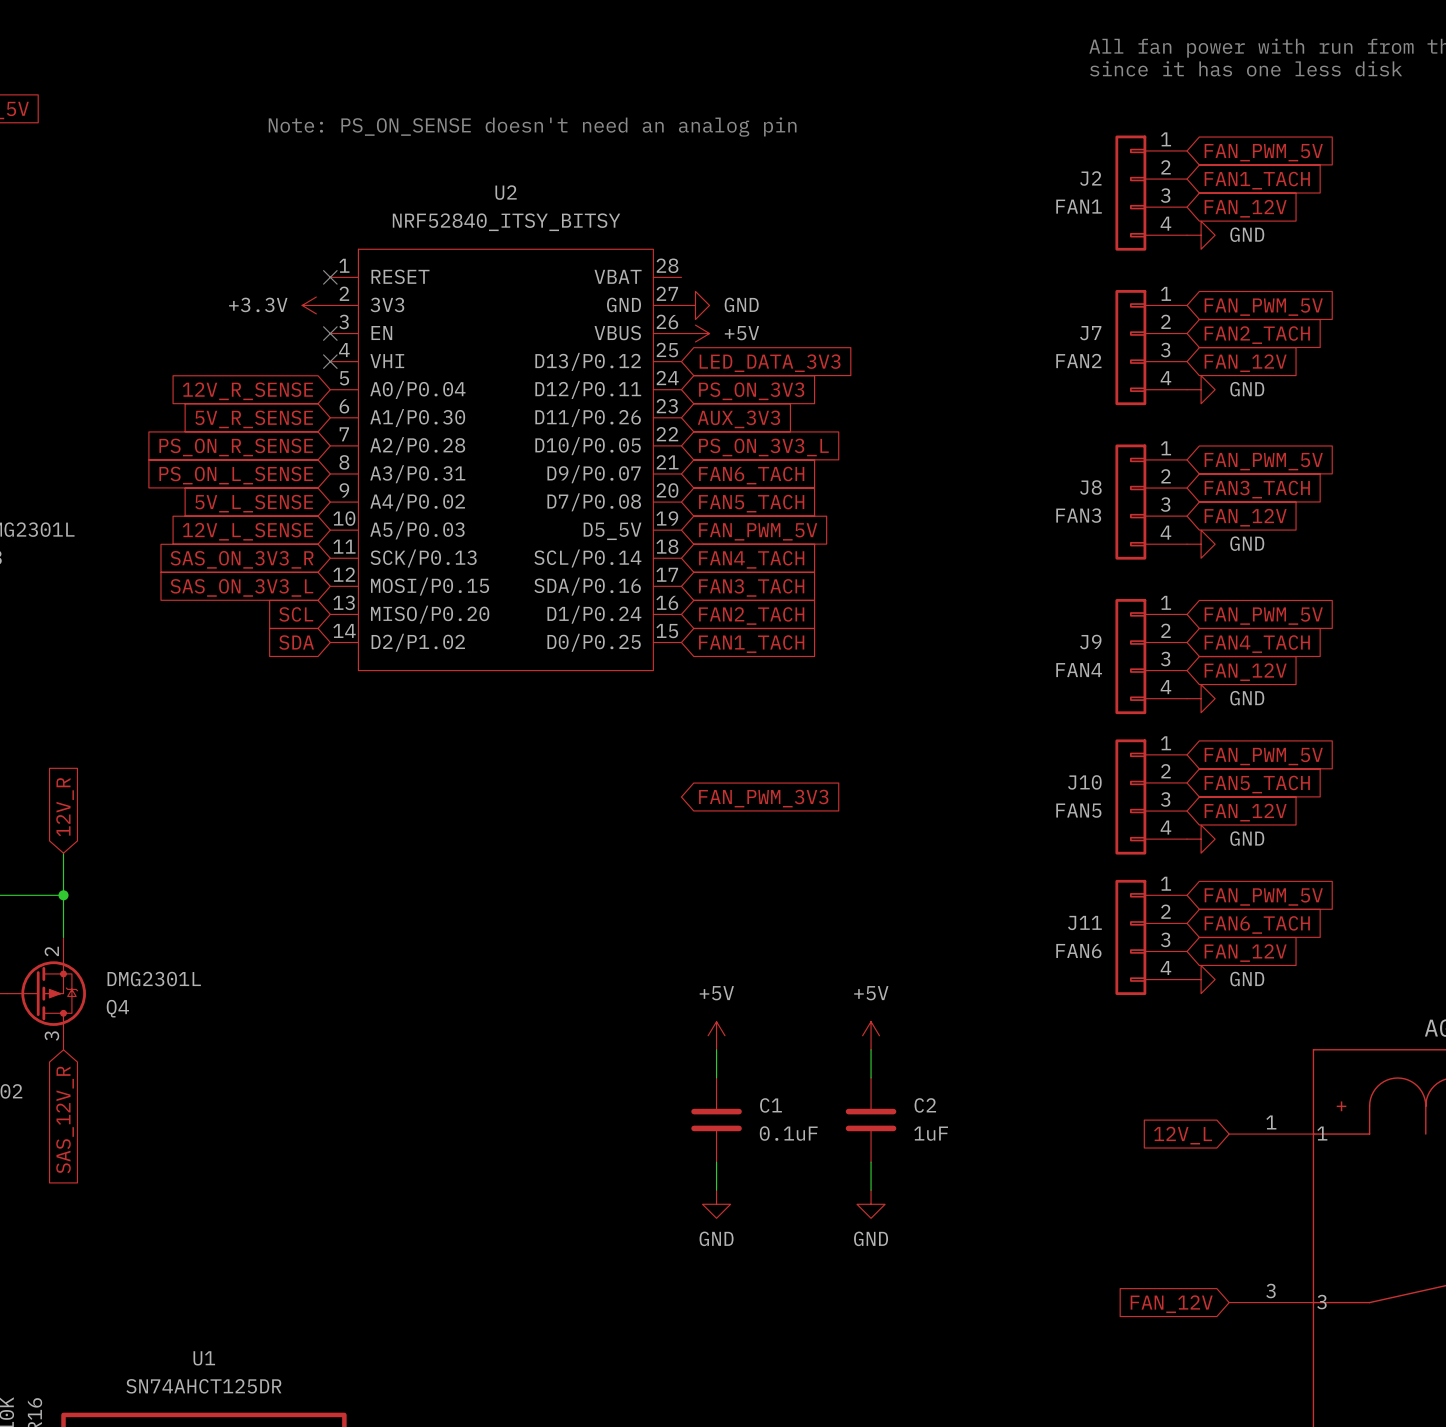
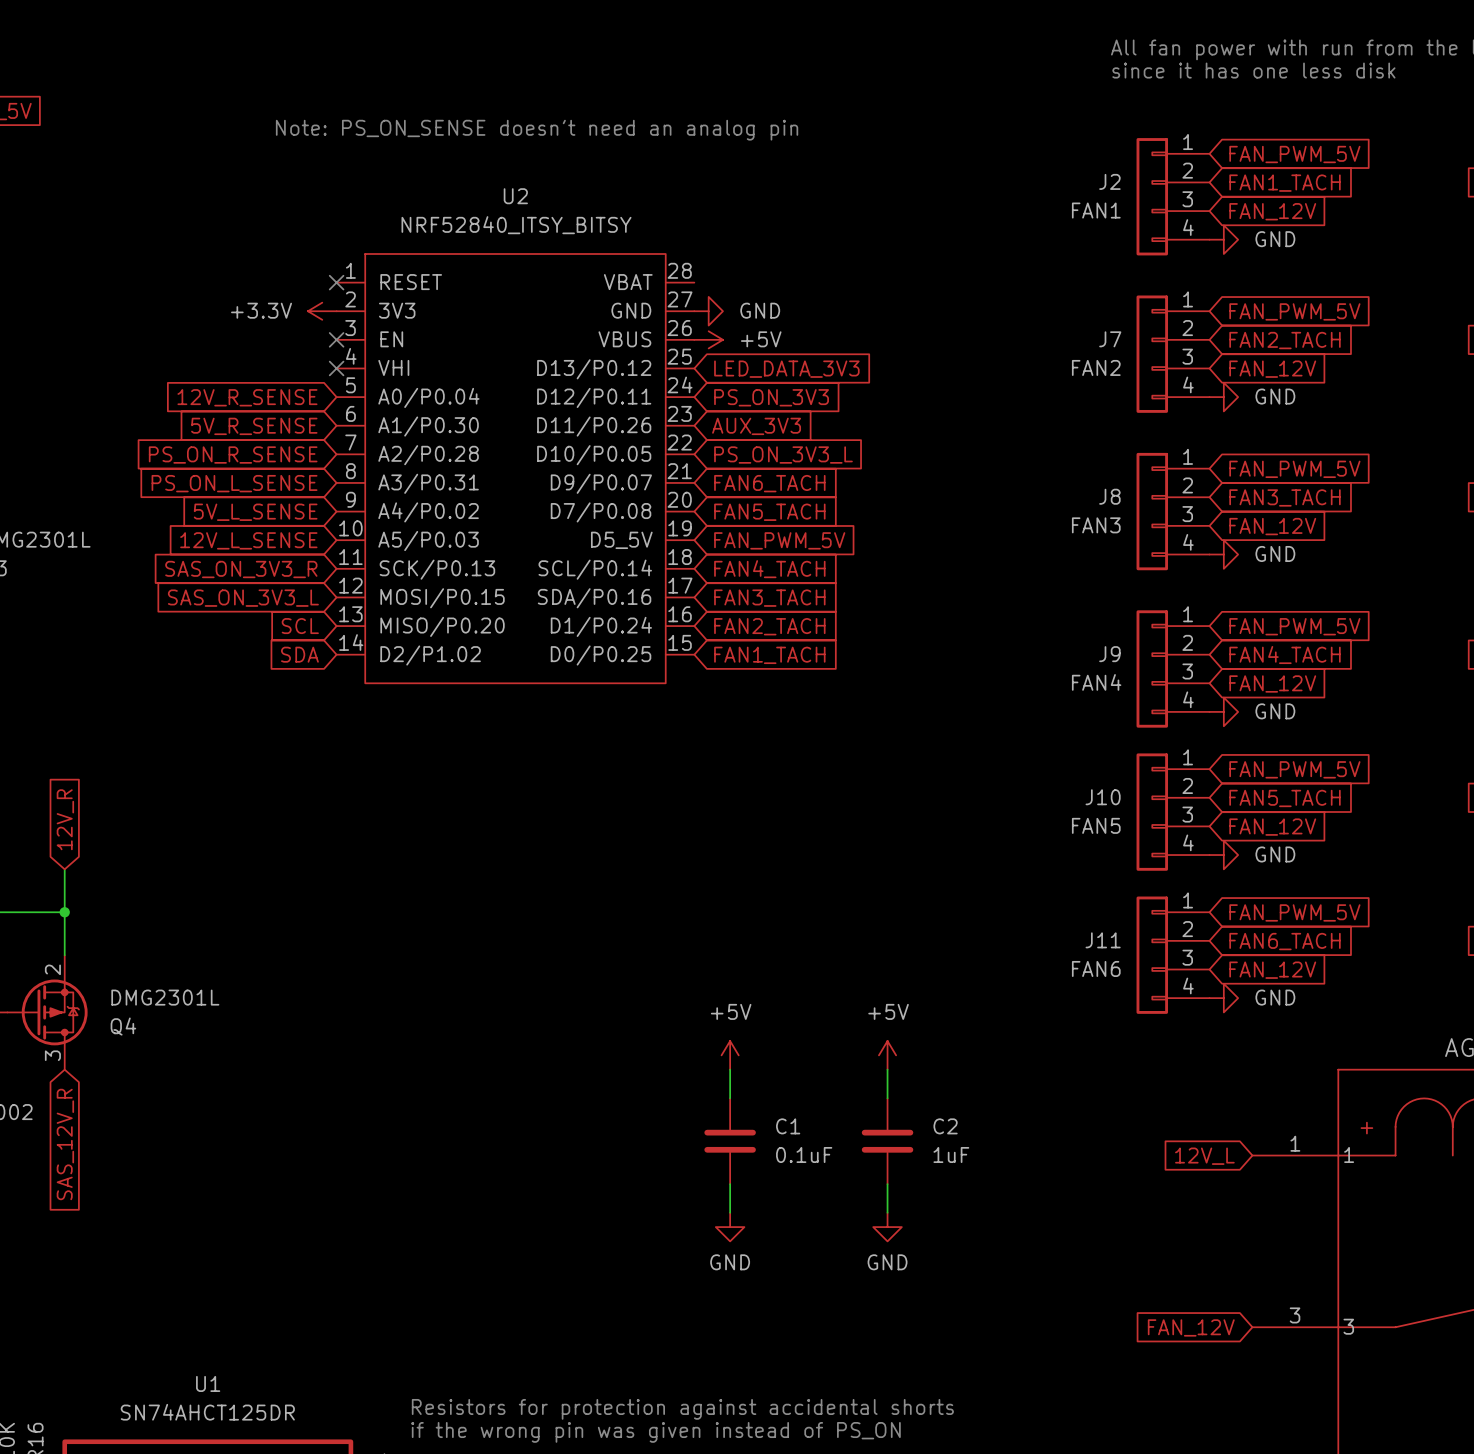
global label: FAN_PWM_3V3 (763, 798) -> none
text: none -> Resistors for protection against accidental shorts (682, 1409)
text: none -> if the wrong pin was given instead of PS_ON (655, 1432)

